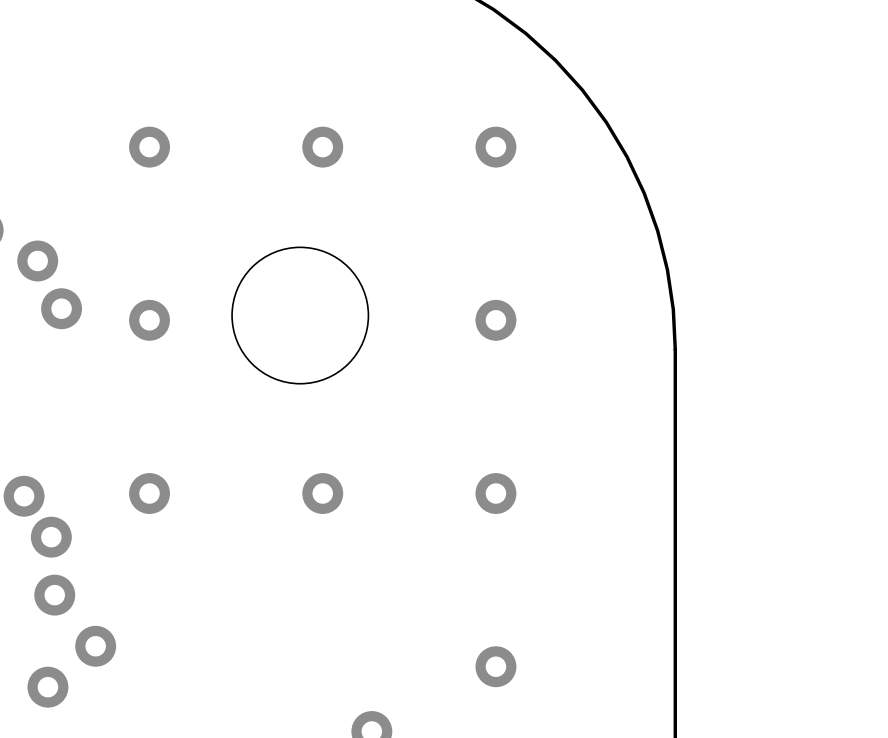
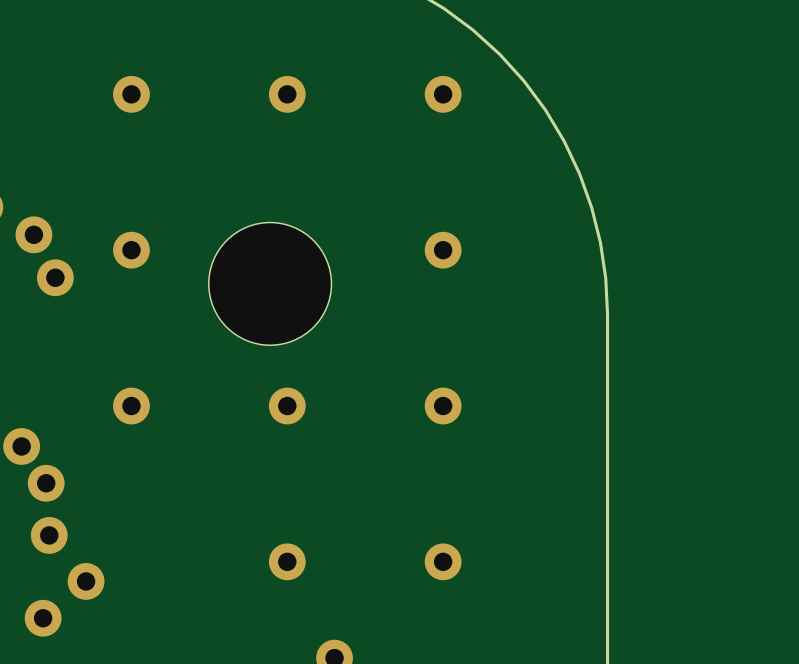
via position: (149, 147) -> (131, 94)
via position: (322, 147) -> (287, 94)
via position: (495, 147) -> (443, 94)
via position: (149, 320) -> (131, 250)
via position: (495, 320) -> (443, 250)
via position: (149, 493) -> (131, 406)
via position: (322, 493) -> (287, 406)
via position: (495, 493) -> (443, 406)
via: none -> (287, 561)
via position: (495, 666) -> (443, 561)

